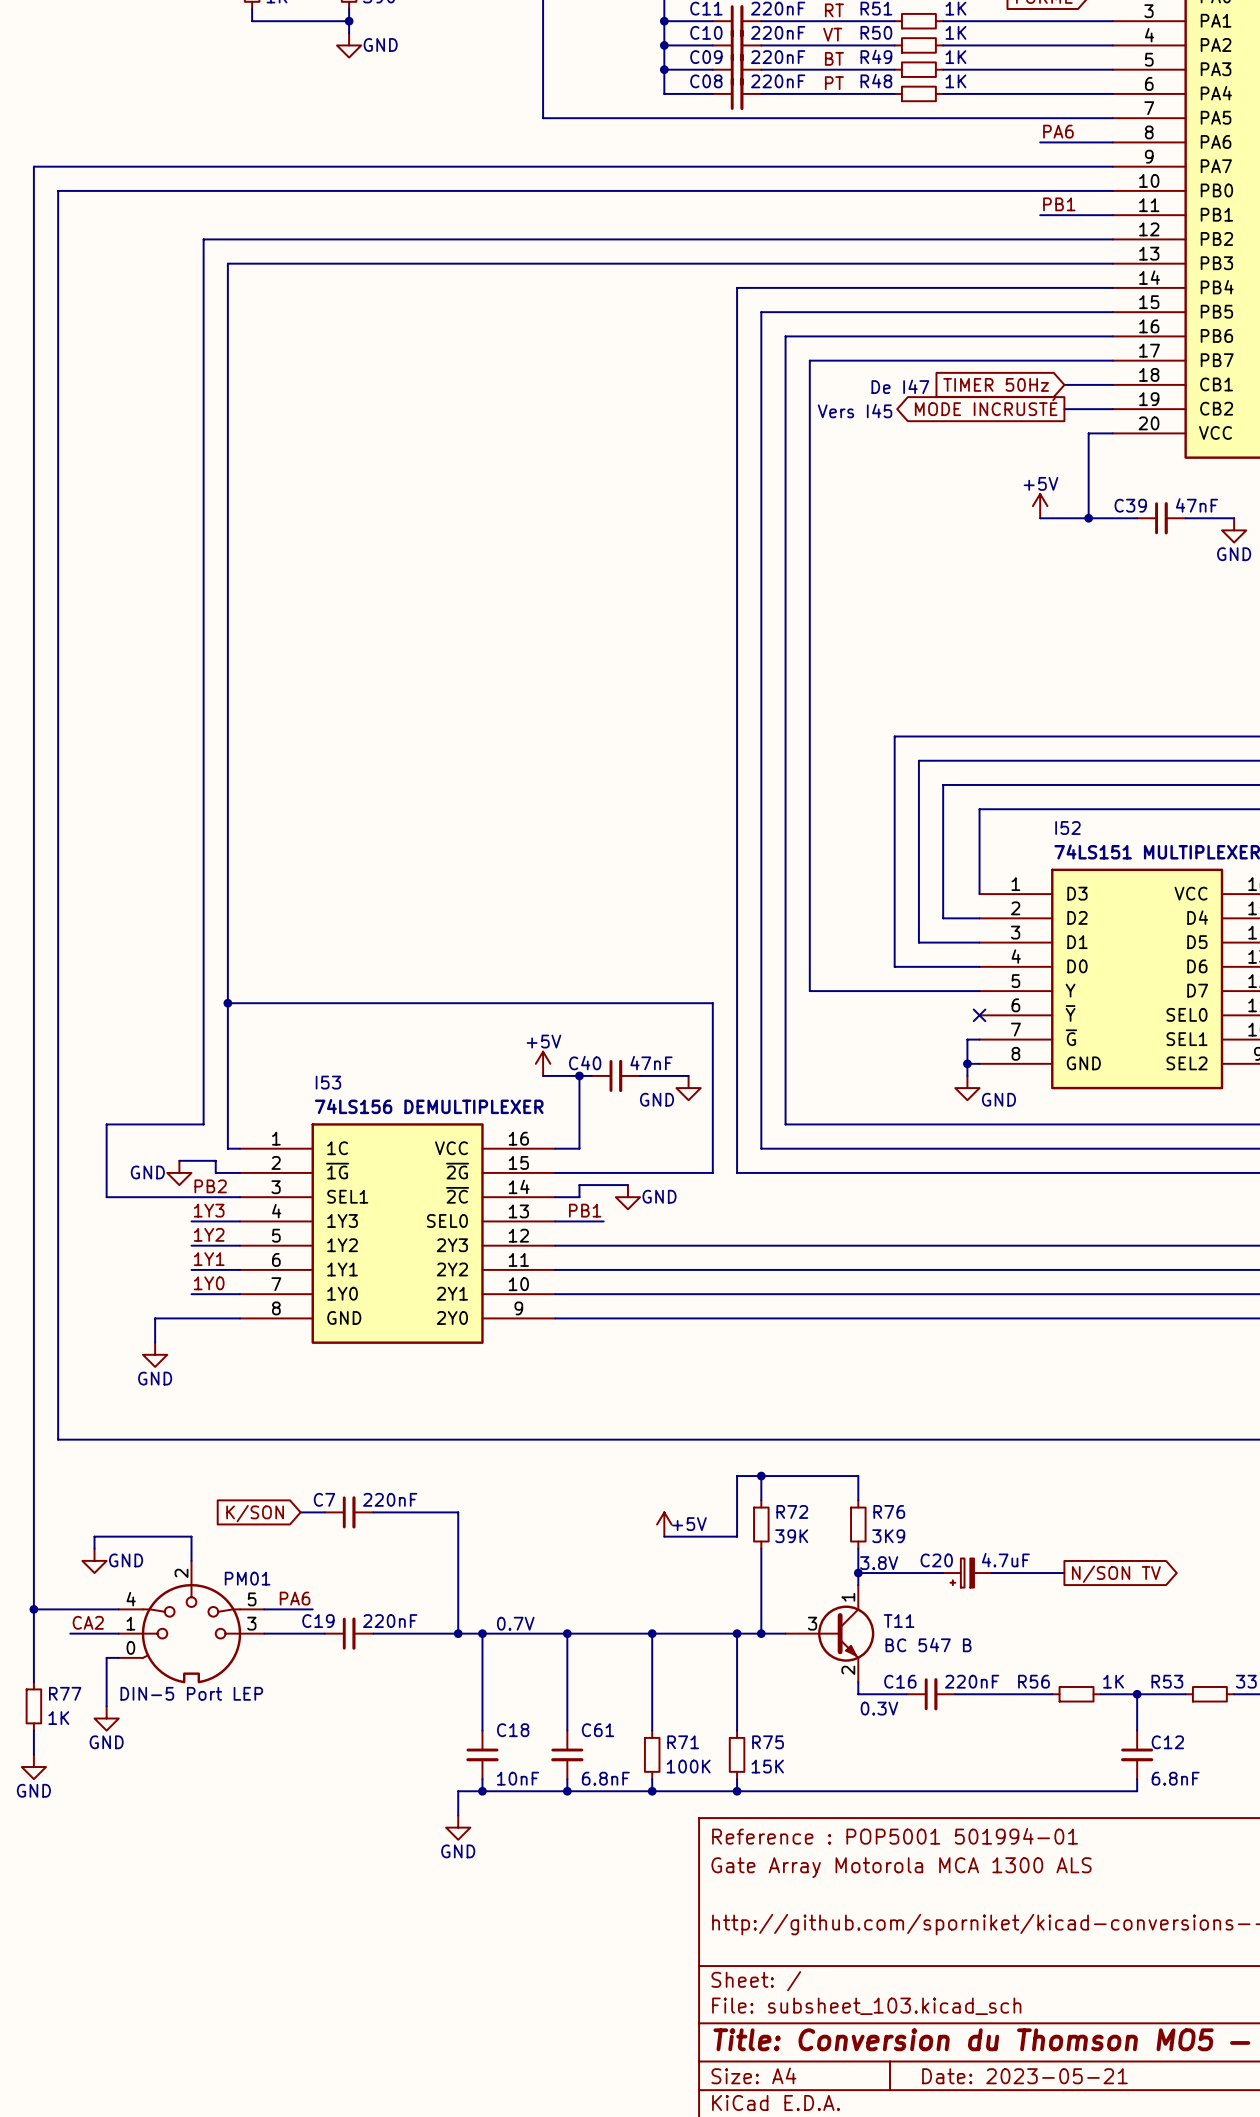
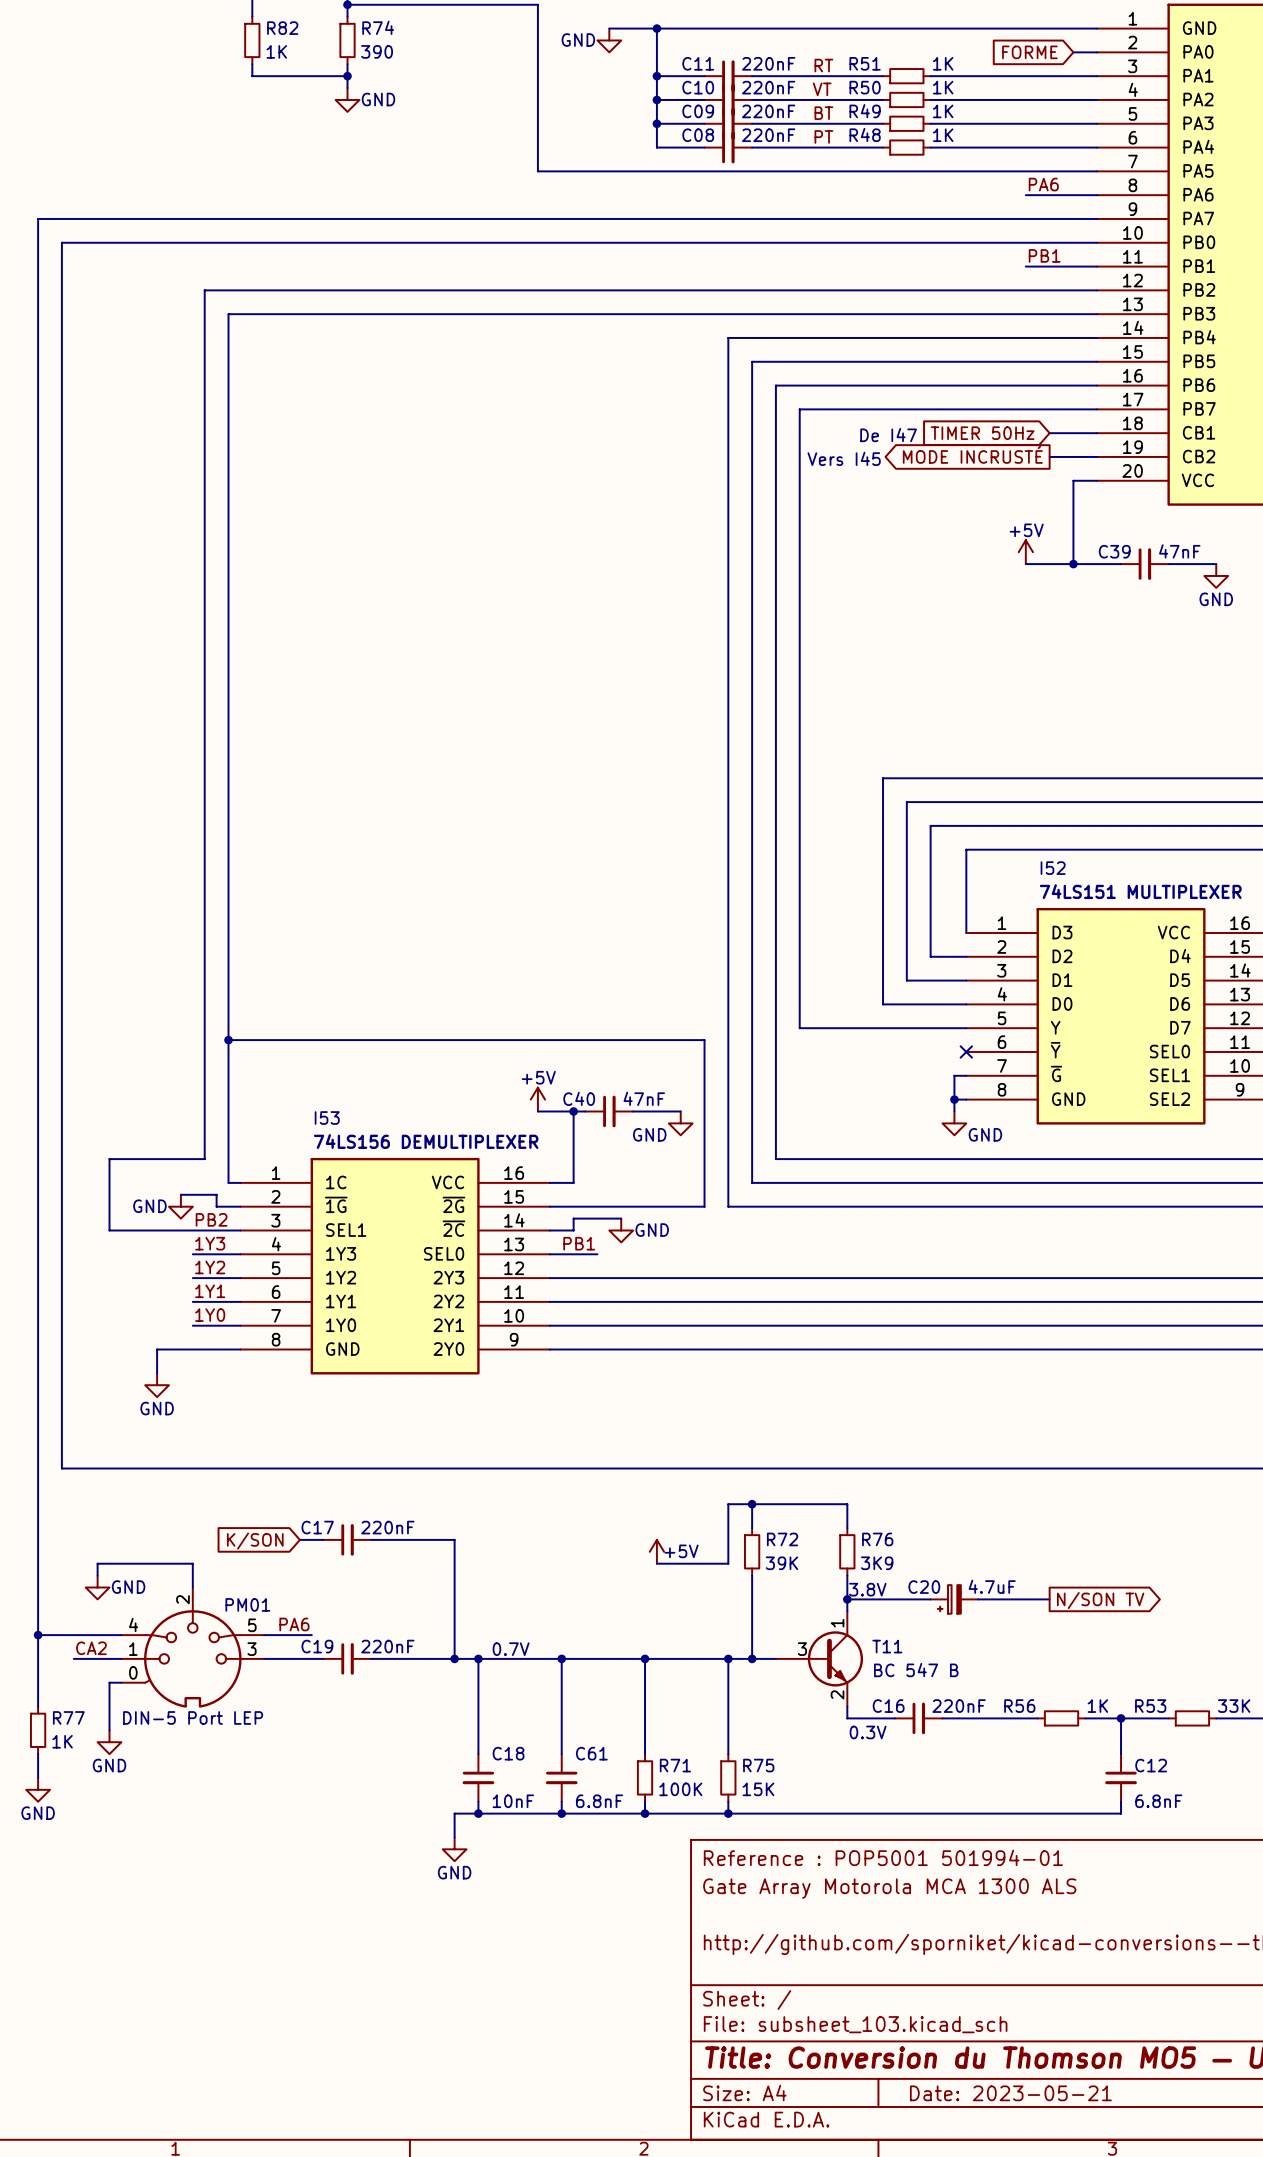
C7 name: C7 (324, 1499) -> C17 (317, 1527)

